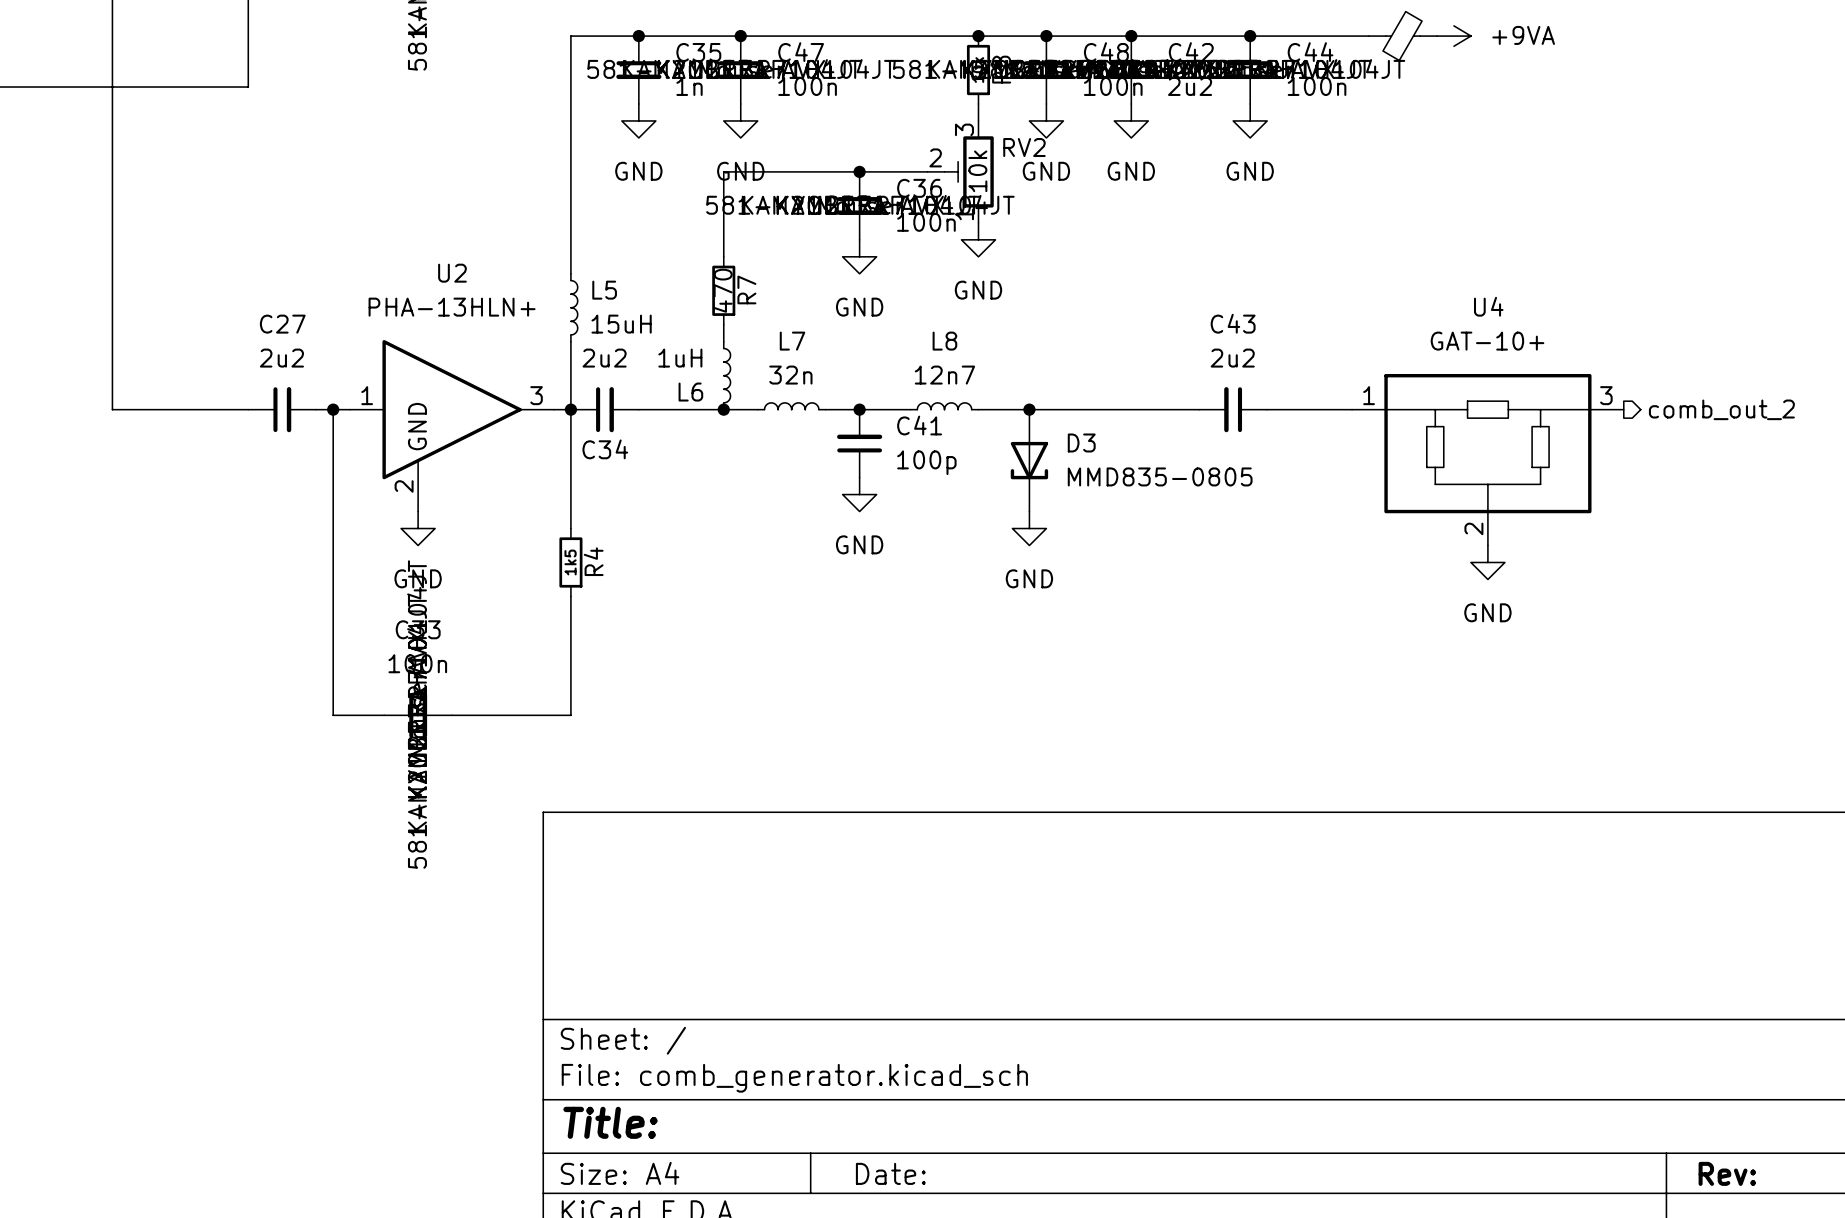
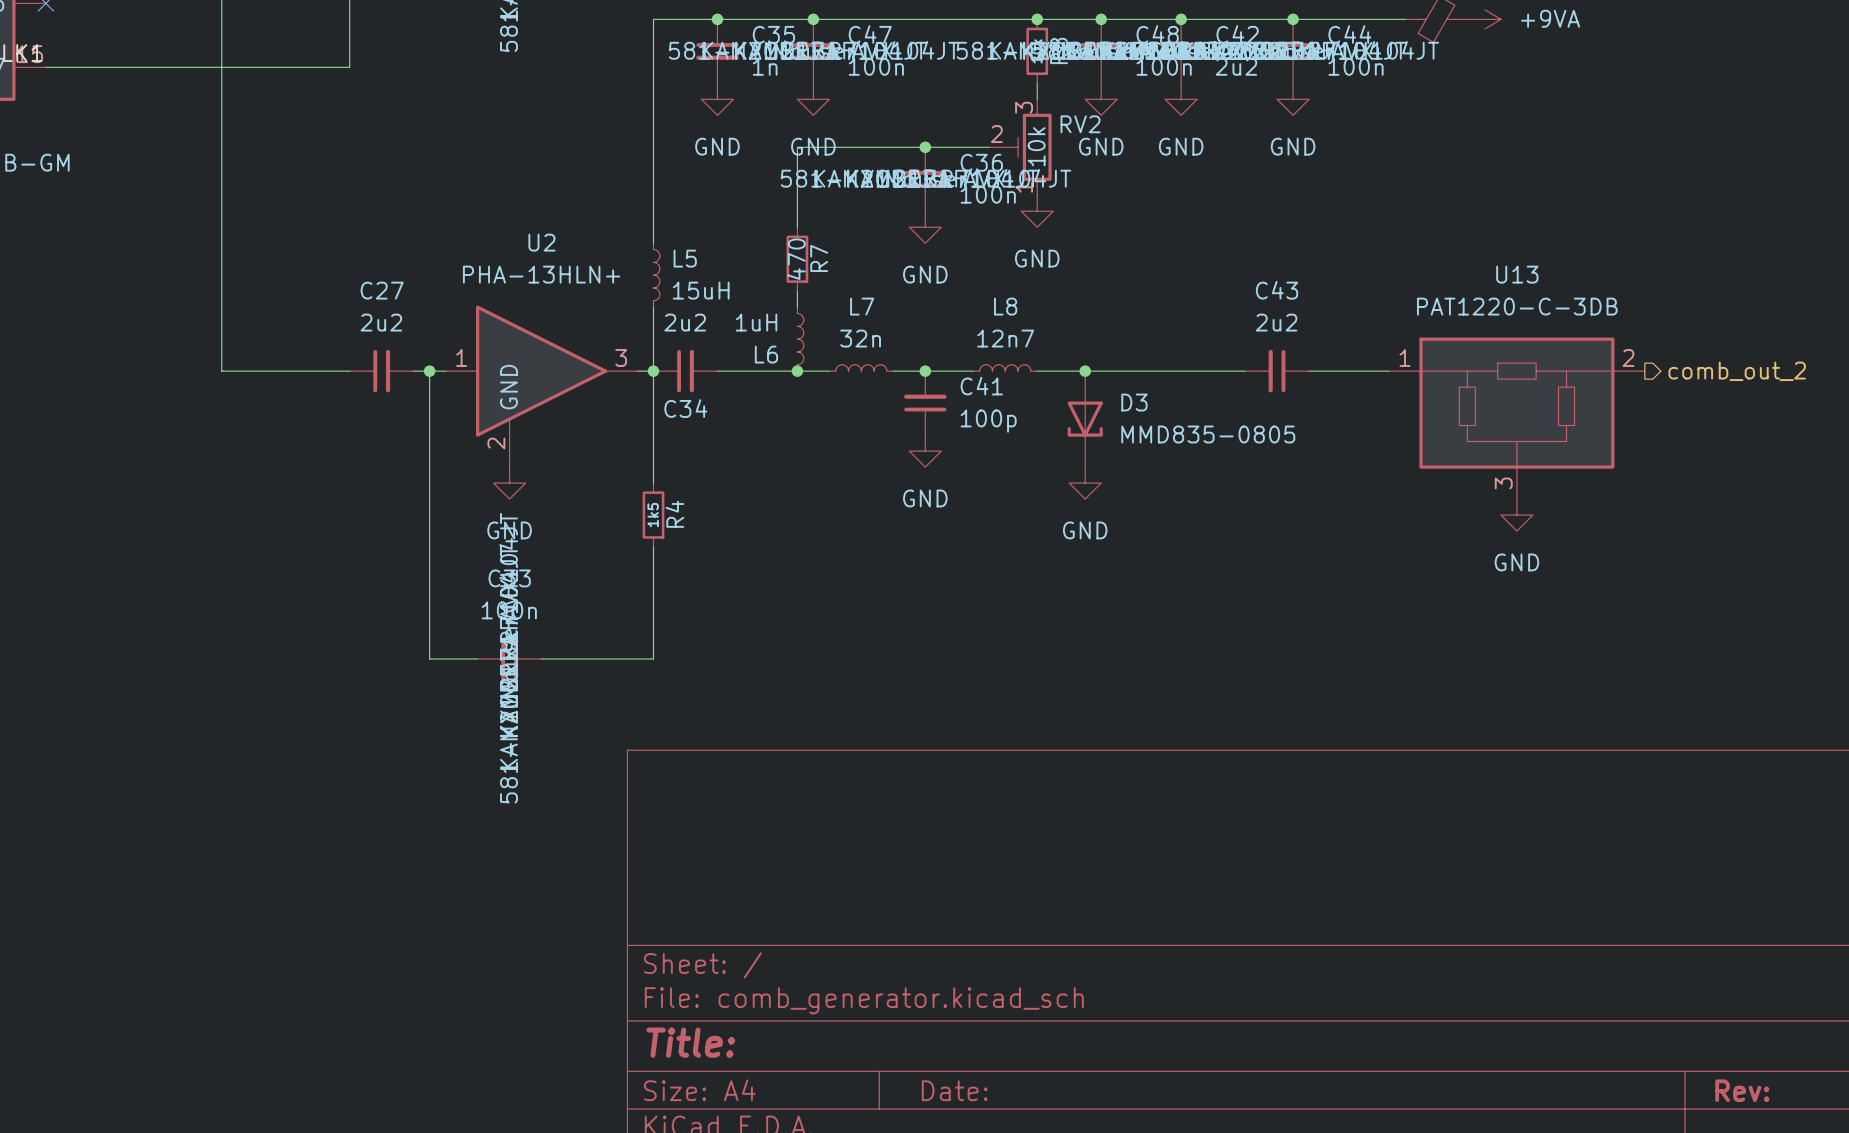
U4 name: U4 (1488, 306) -> U13 (1517, 274)
U4 value: GAT-10+ (1487, 341) -> PAT1220-C-3DB (1517, 306)
U4 pin number: 3 (1606, 395) -> 2 (1628, 357)
U4 pin number: 2 (1473, 528) -> 3 (1503, 483)

